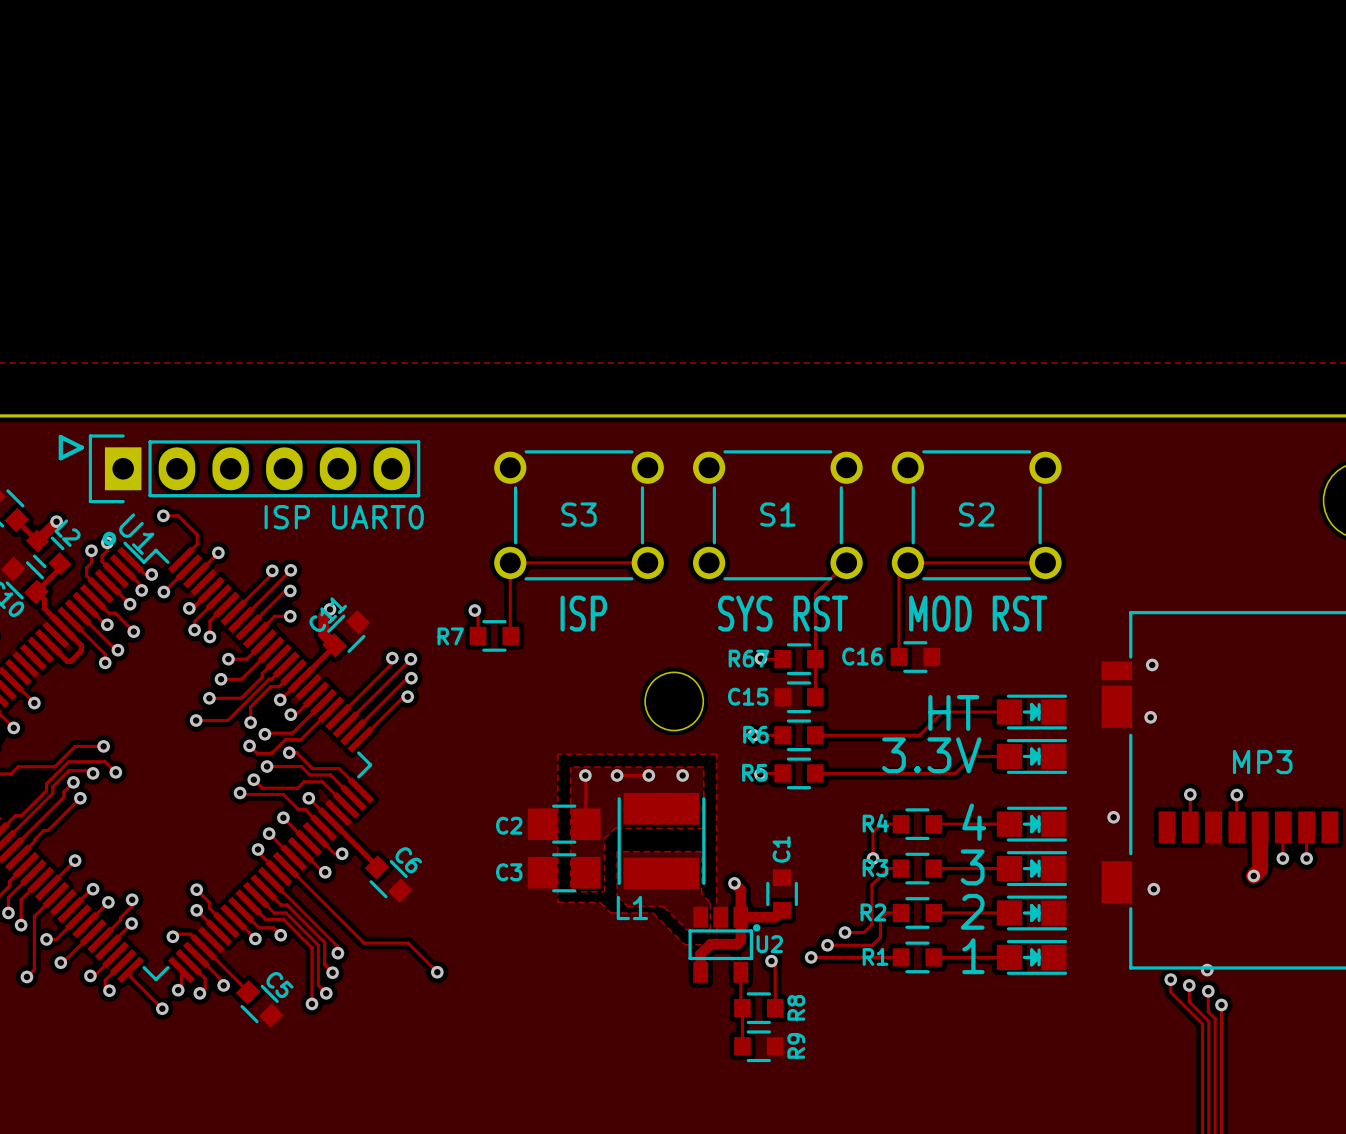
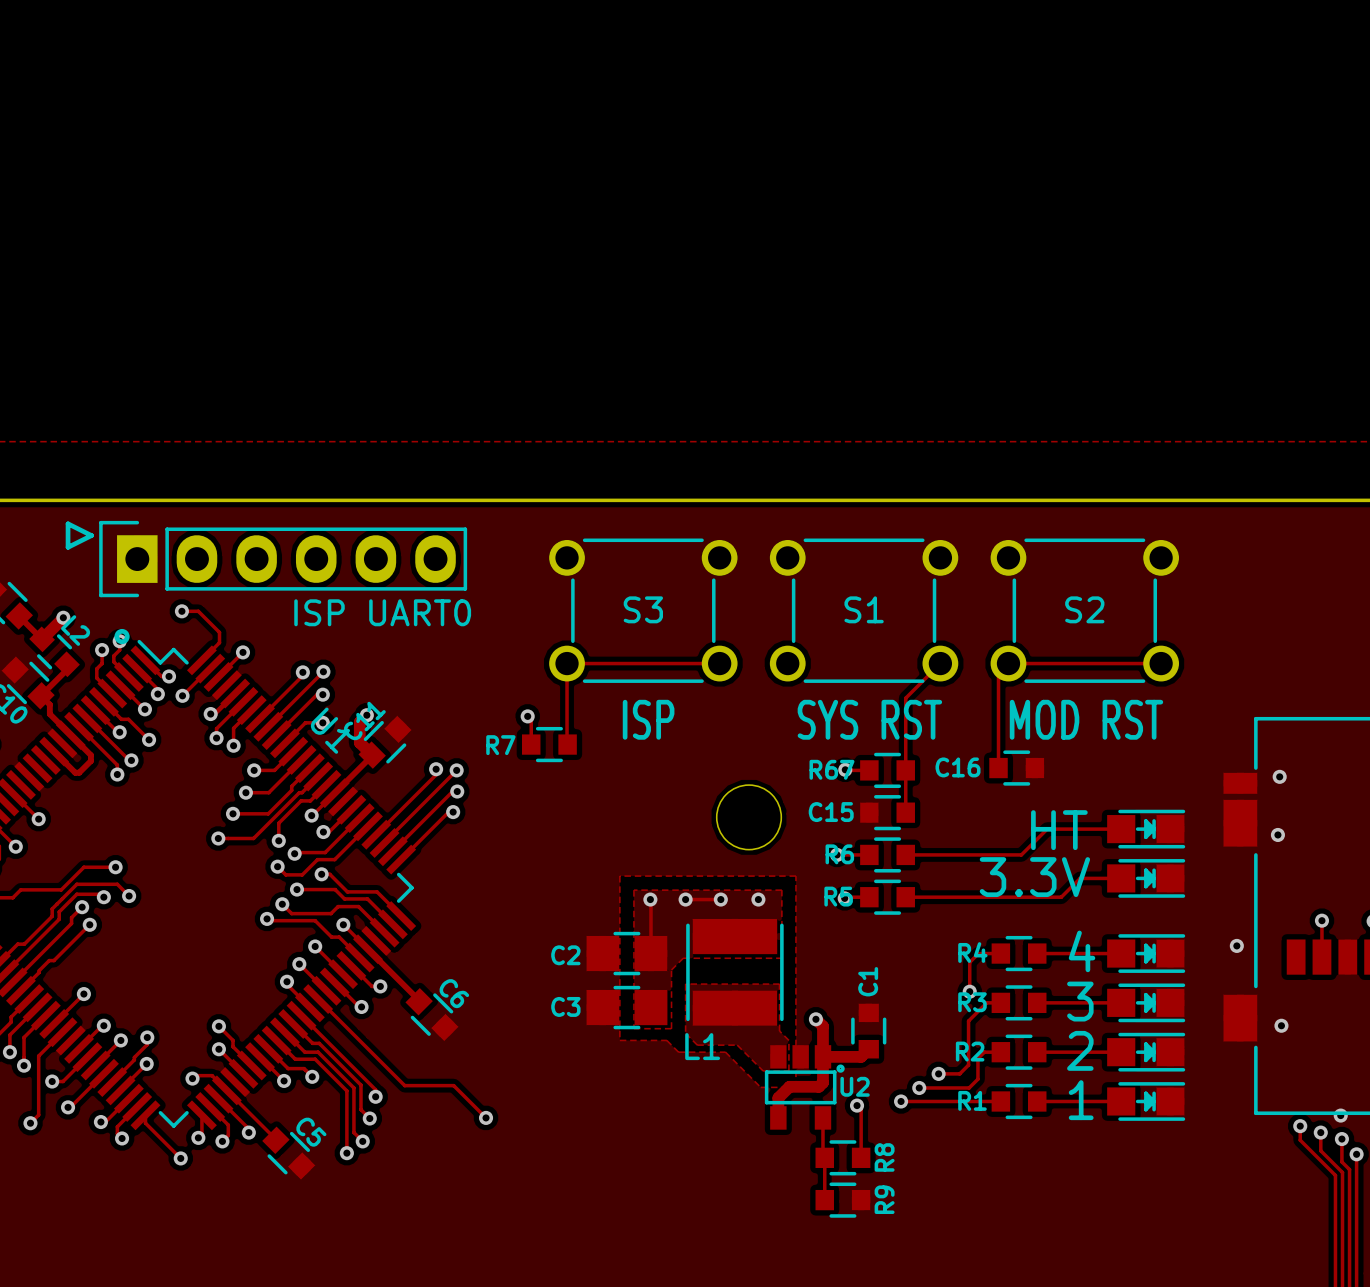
U1 name position: U1 (136, 534) -> U1 (330, 730)

